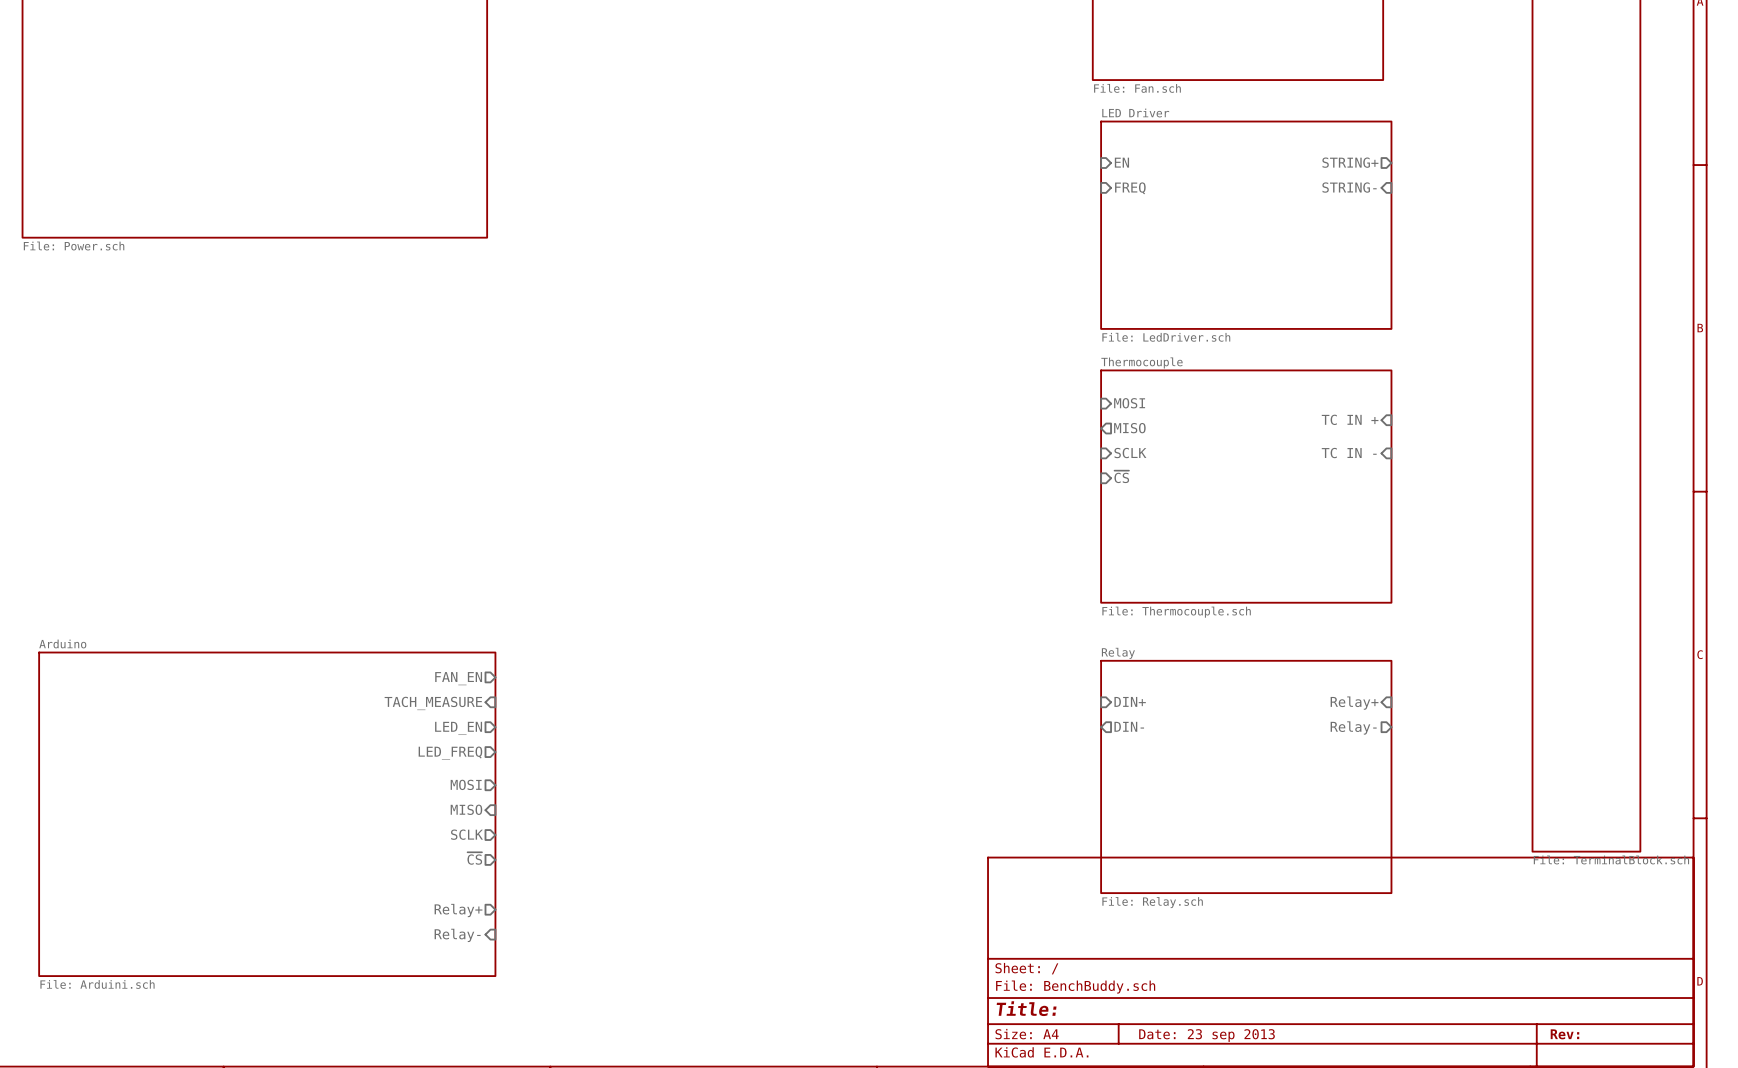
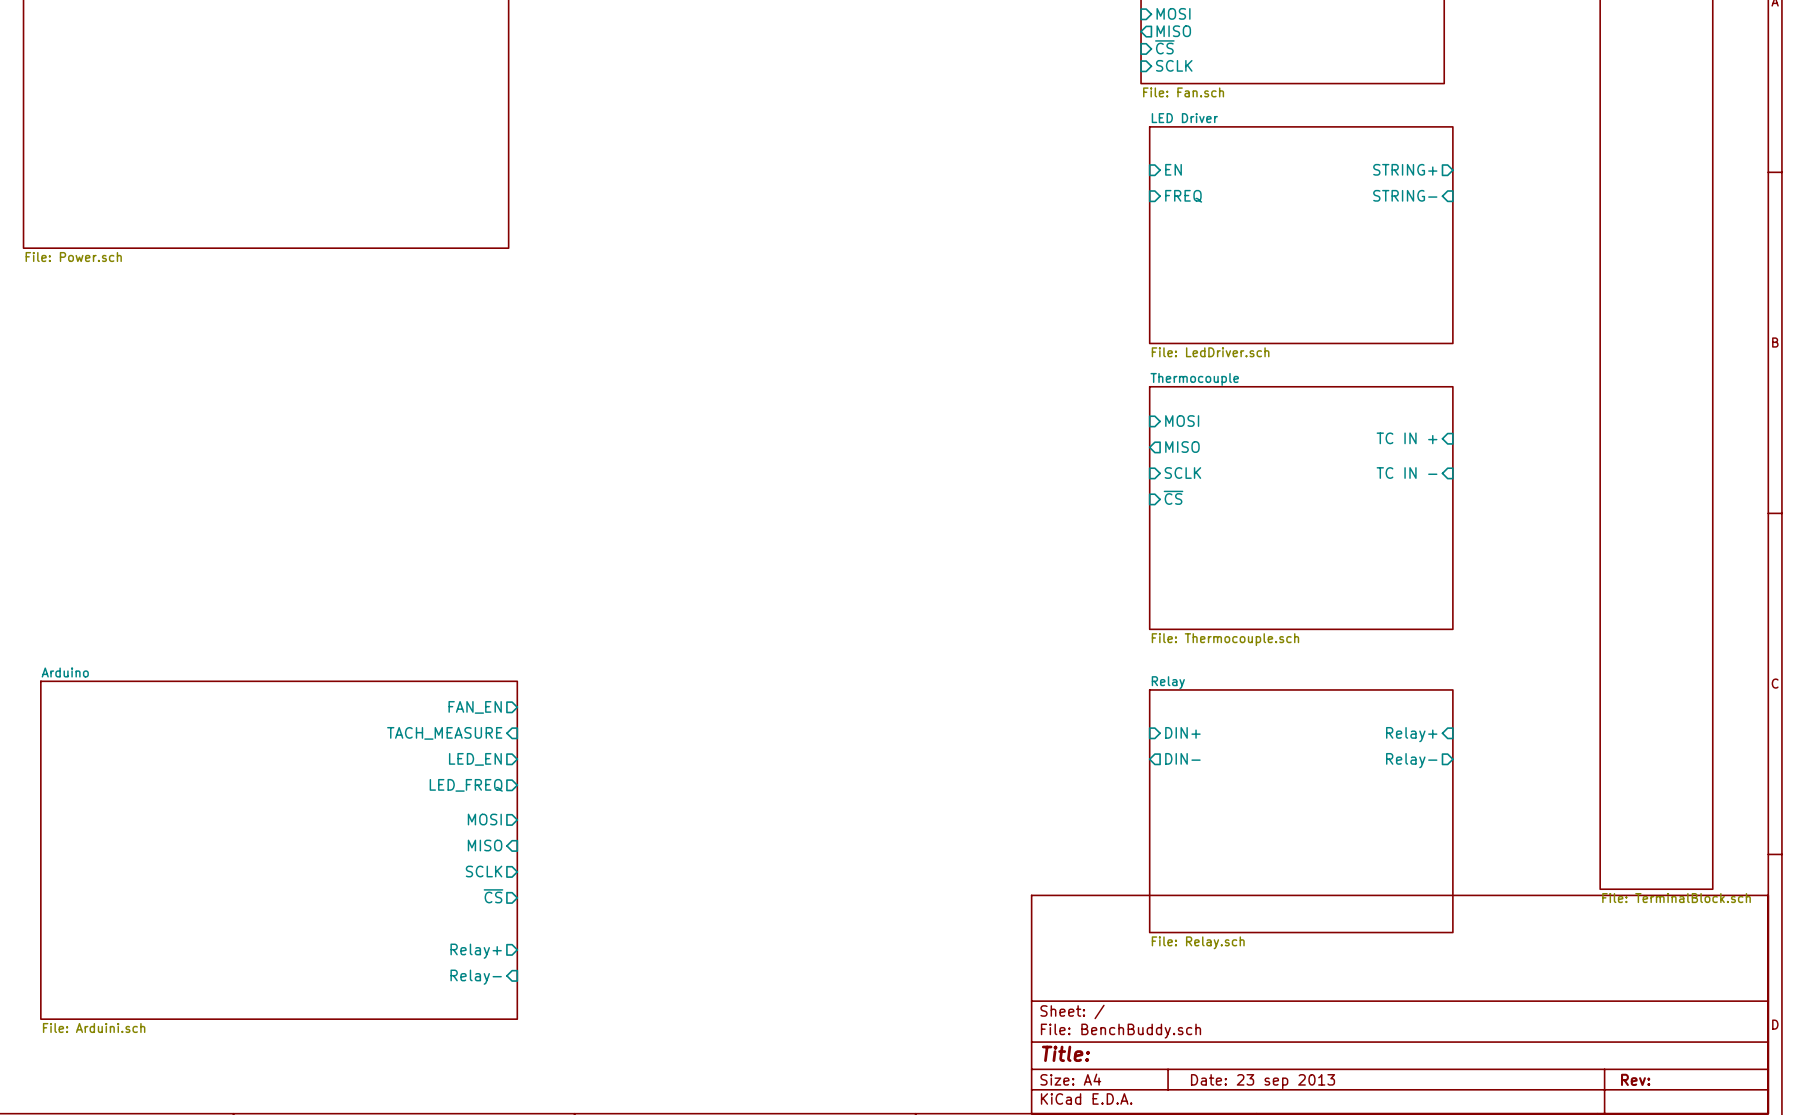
sheet pin: none -> MOSI (1173, 13)
sheet pin: none -> MISO (1173, 31)
sheet pin: none -> ~{CS} (1164, 47)
sheet pin: none -> SCLK (1174, 65)

